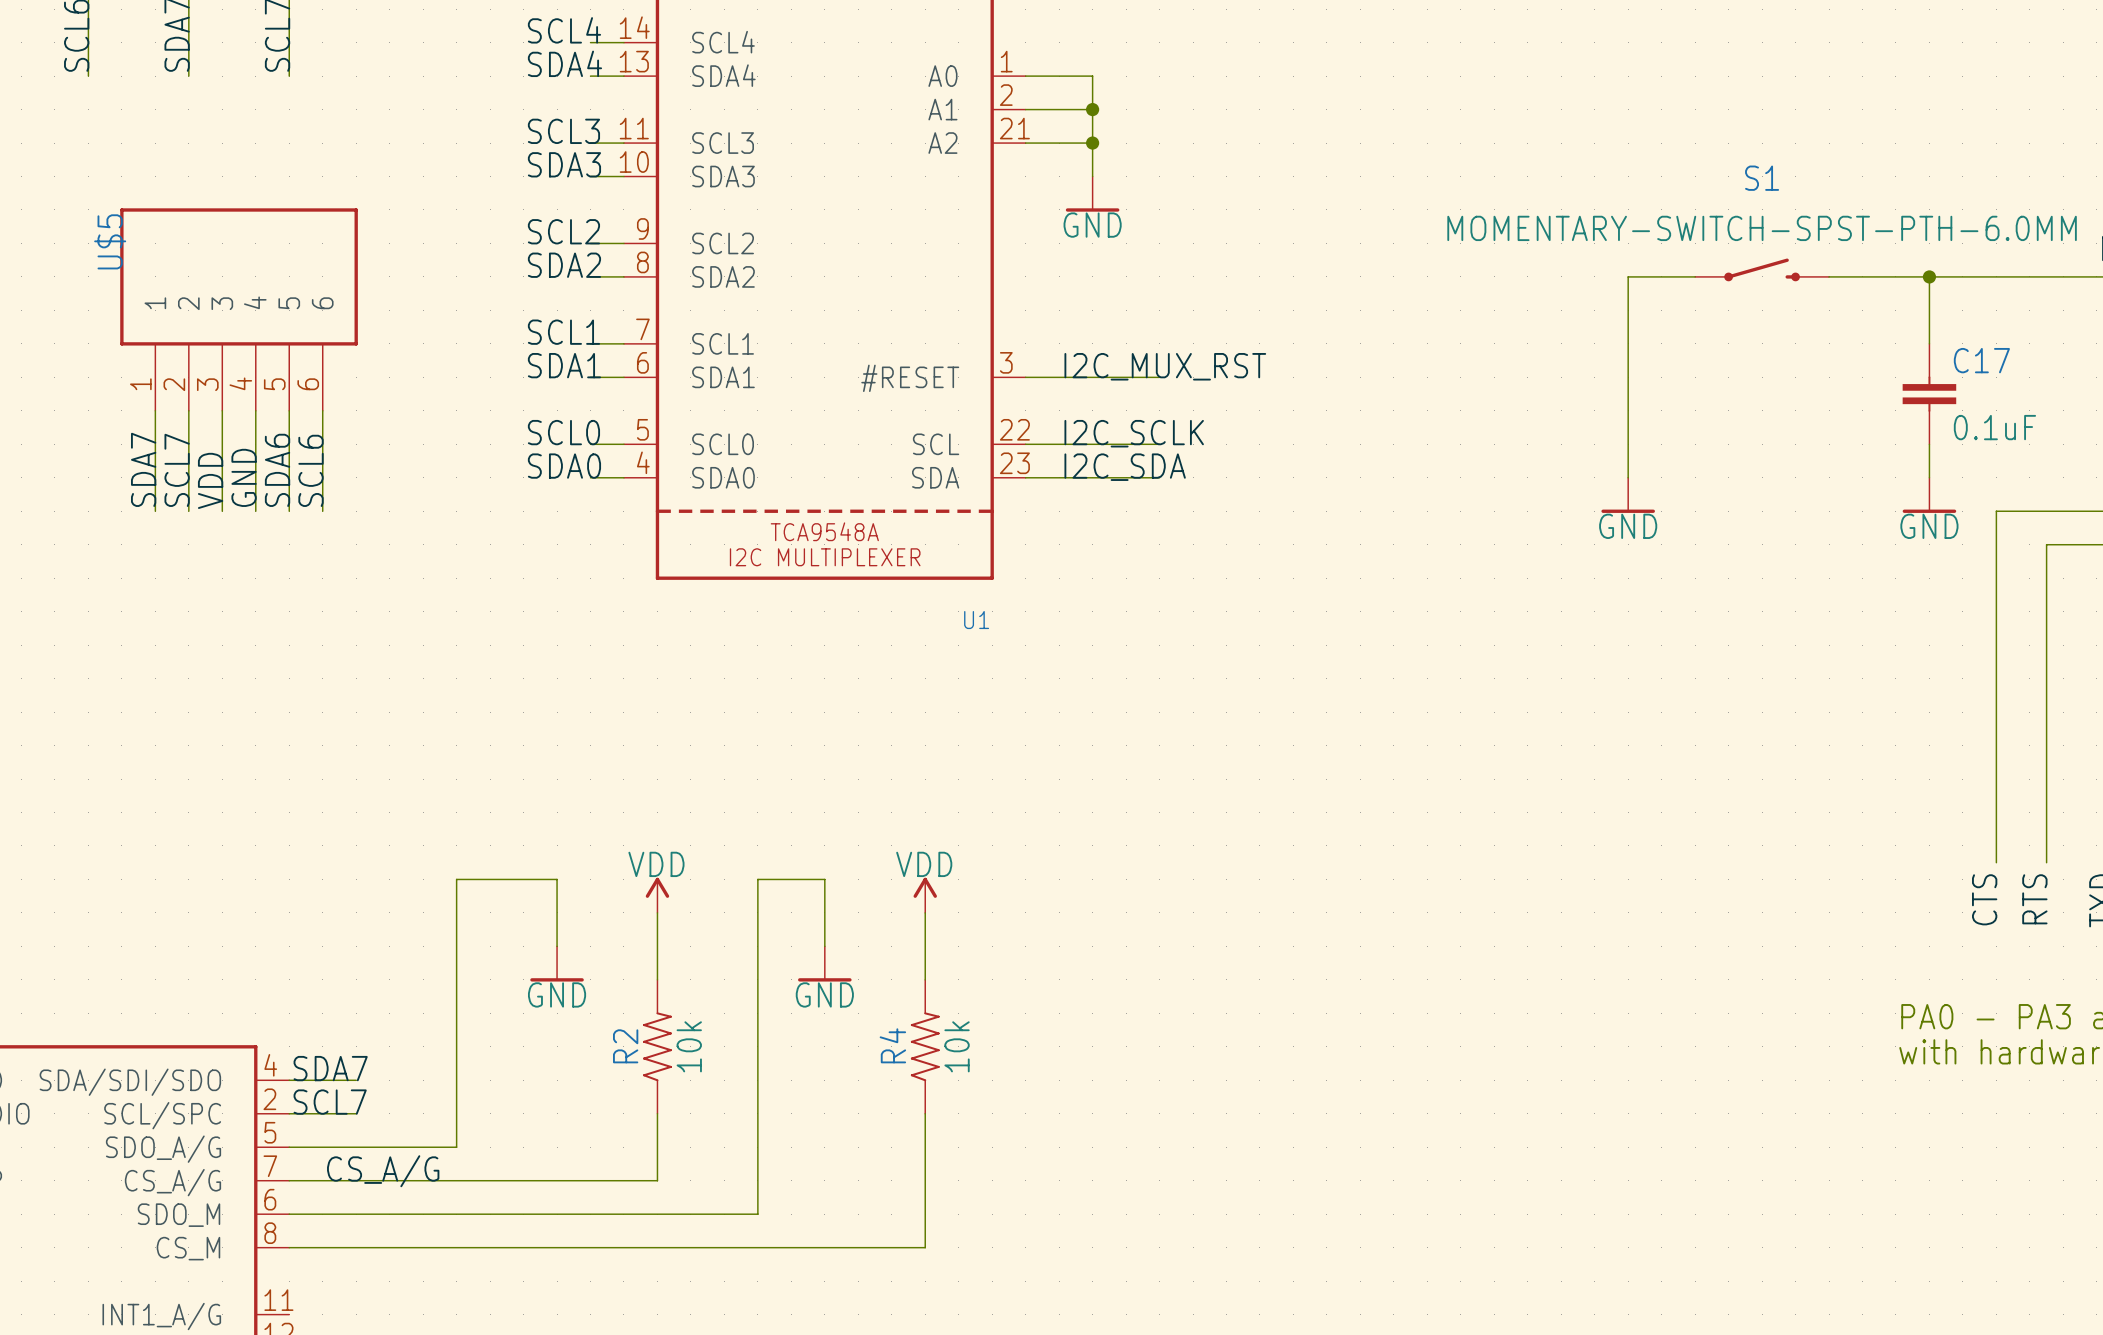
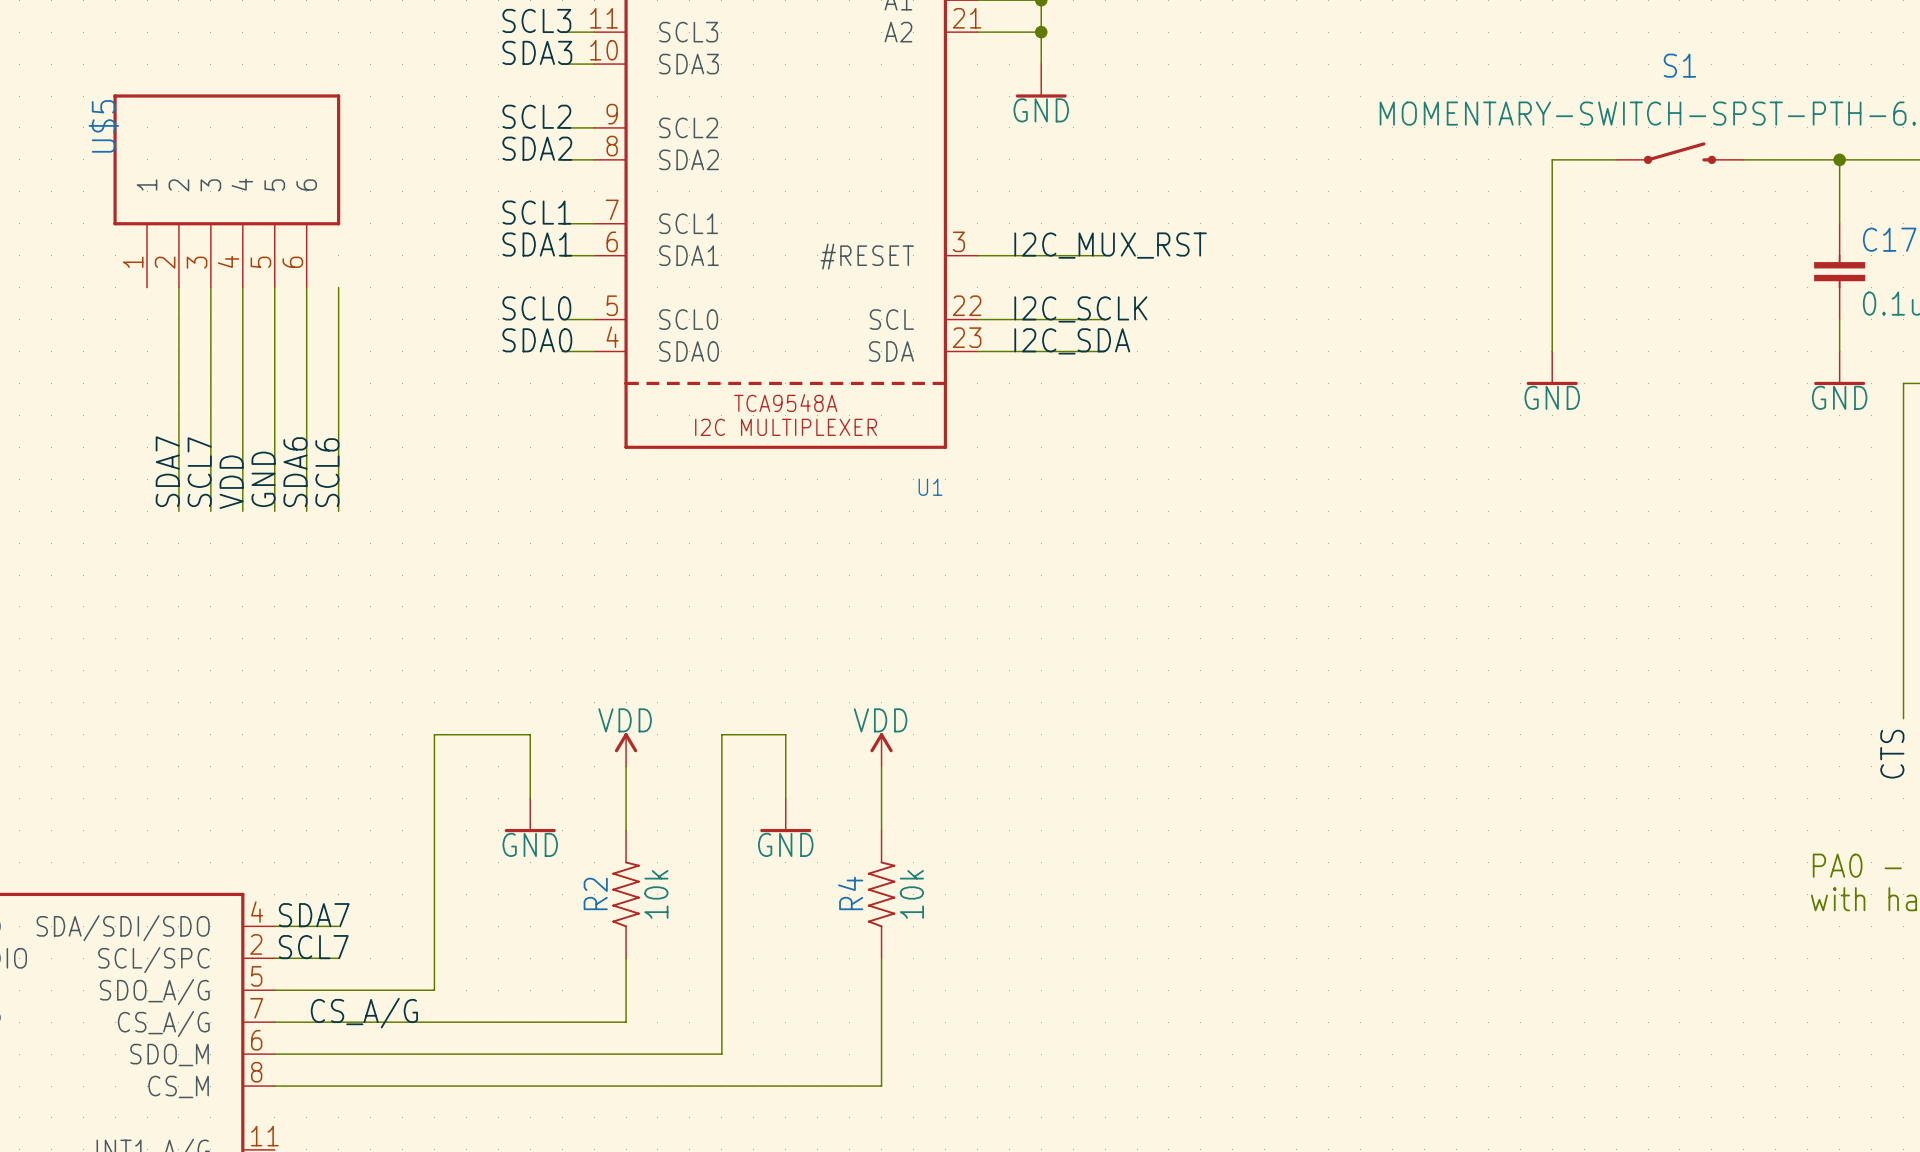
wire: (155, 410) (155, 511) -> none
wire: none -> (338, 287) (338, 511)
label position: SDA7 (143, 469) -> SDA7 (167, 471)
label position: SCL7 (177, 470) -> SCL7 (199, 472)
label position: SDA6 (277, 470) -> SDA6 (295, 472)
label position: SCL6 (311, 470) -> SCL6 (327, 472)
label position: GND (244, 477) -> GND (263, 479)
label position: VDD (210, 480) -> VDD (231, 482)
wire: none -> (178, 383) (178, 511)
wire: none -> (210, 383) (210, 511)
wire: none -> (242, 383) (242, 511)
wire: none -> (274, 383) (274, 511)
wire: none -> (306, 383) (306, 511)

